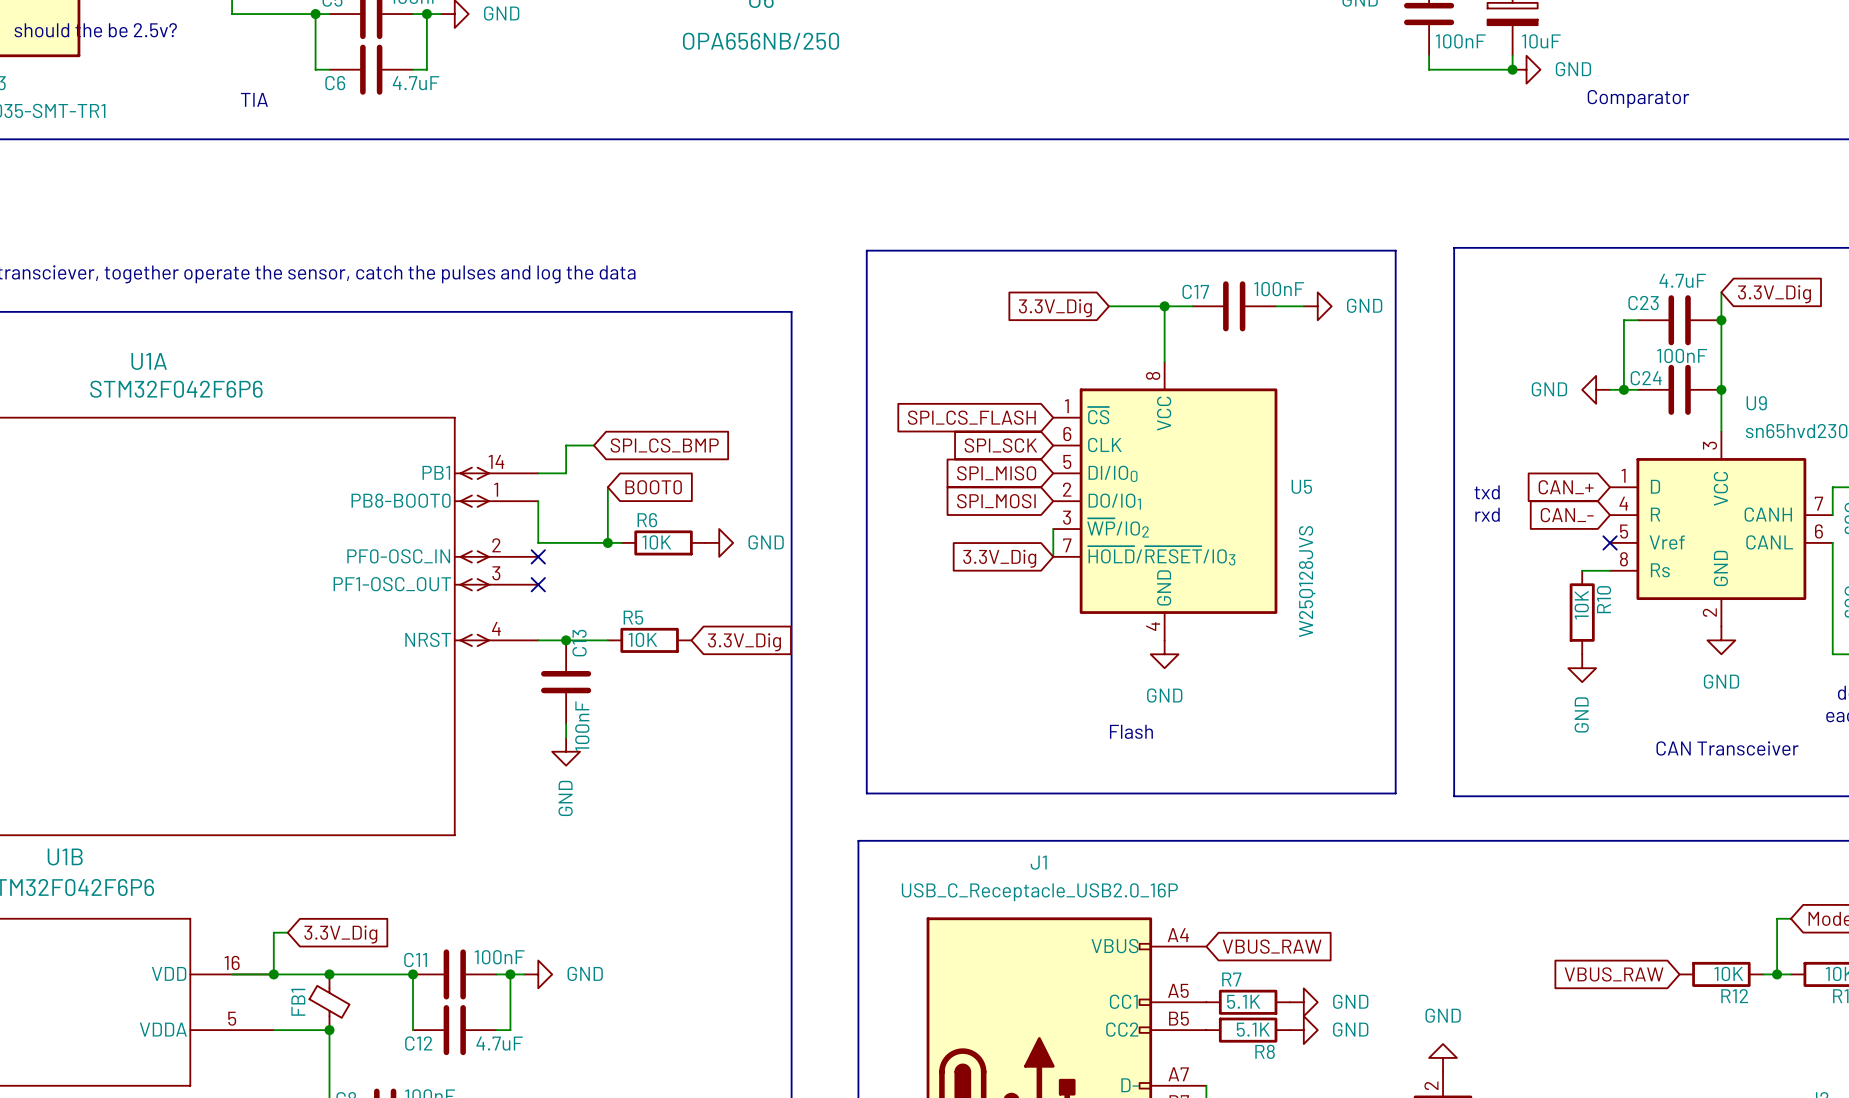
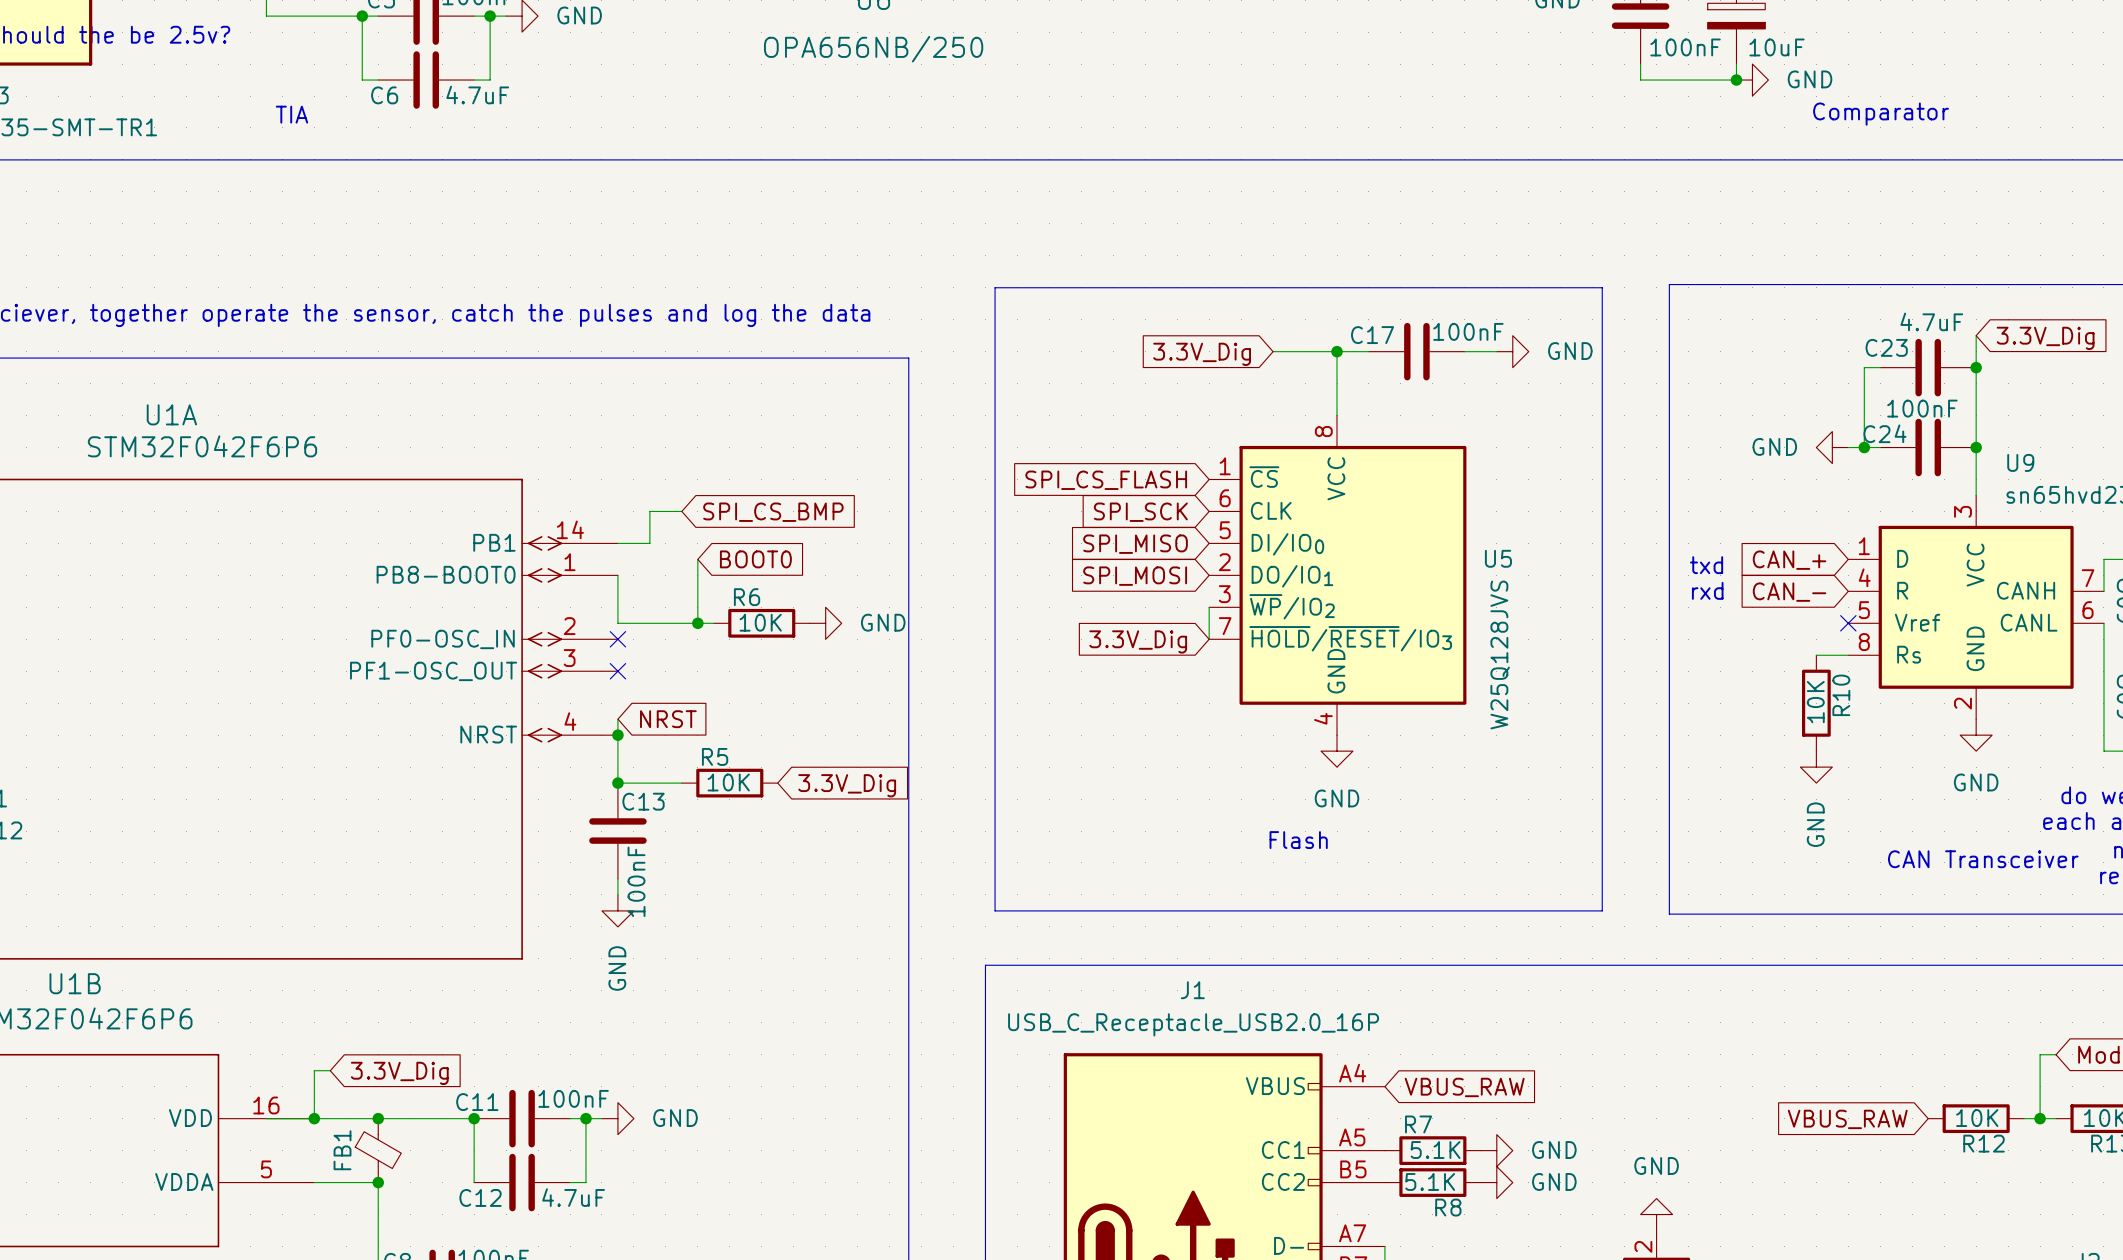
wire: none -> (617, 719) (617, 783) (681, 783)
global label: none -> NRST (668, 719)
junction: none -> (617, 735)
junction: (566, 640) -> none
R5 position: (649, 640) -> (729, 783)
global label position: 3.3V_Dig (744, 642) -> 3.3V_Dig (847, 785)
C13 name rotation: 0° (579, 643) -> 90° clockwise (643, 801)
junction: none -> (617, 783)
C13 position: (566, 682) -> (617, 831)
wire: (566, 723) (566, 737) -> (617, 878) (617, 894)
power symbol position: GND (566, 751) -> GND (617, 910)

